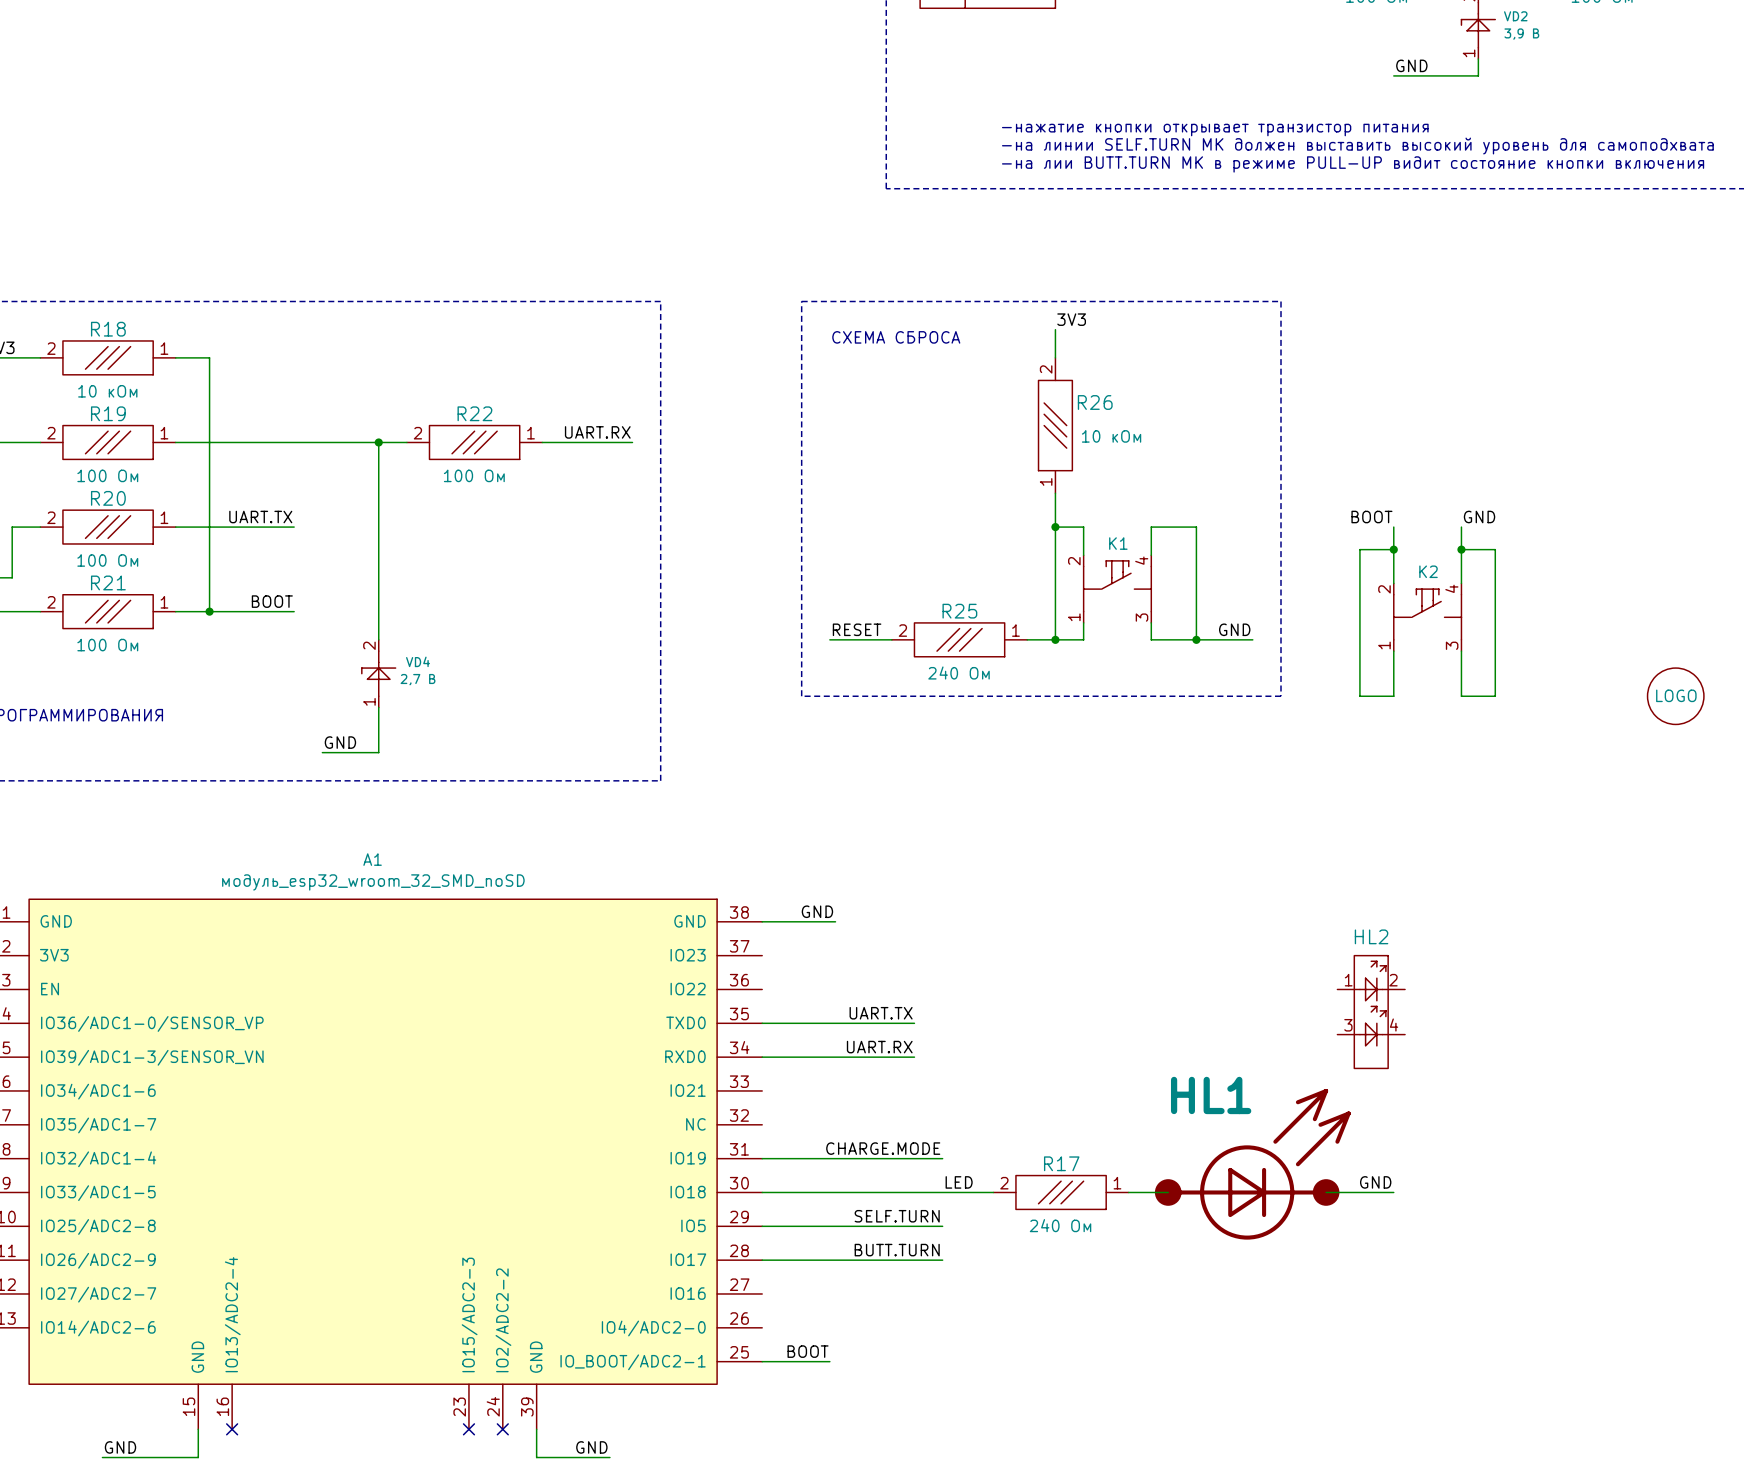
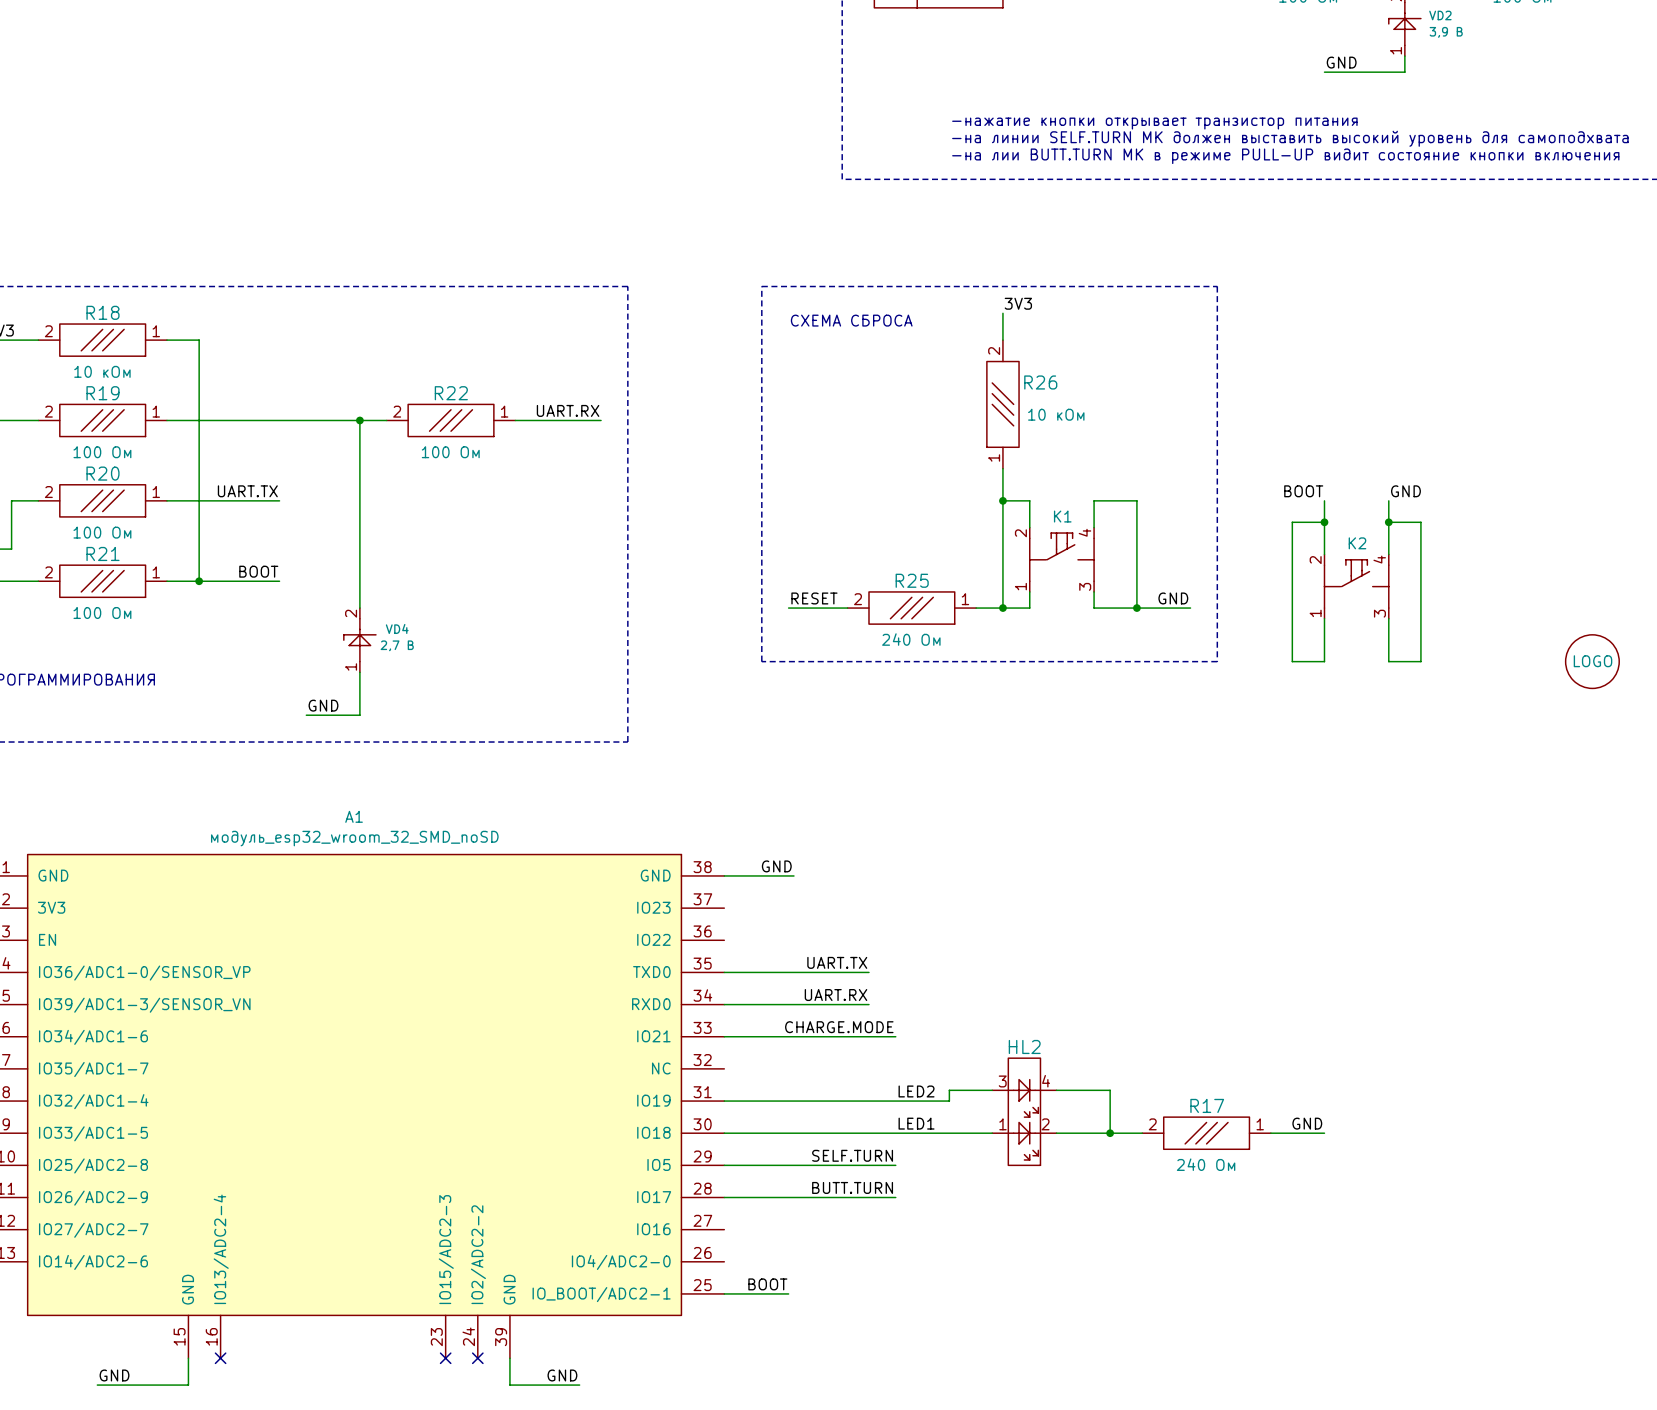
HL2 flip: as is (1371, 1012) -> up-down (1024, 1111)
HL2 position: (1371, 1012) -> (1024, 1111)
label: none -> CHARGE.MODE (839, 1027)
wire: none -> (724, 1036) (895, 1036)
wire: none -> (992, 1090) (949, 1090) (949, 1101) (895, 1101)
wire: none -> (1056, 1090) (1110, 1090) (1110, 1133) (1142, 1133)
label: CHARGE.MODE (883, 1148) -> LED2 (916, 1091)
HL1: (1252, 1164) -> none
label: LED (959, 1182) -> LED1 (916, 1123)
wire: none -> (944, 1133) (992, 1133)
R17 position: (1061, 1192) -> (1206, 1133)
junction: none -> (1110, 1133)

